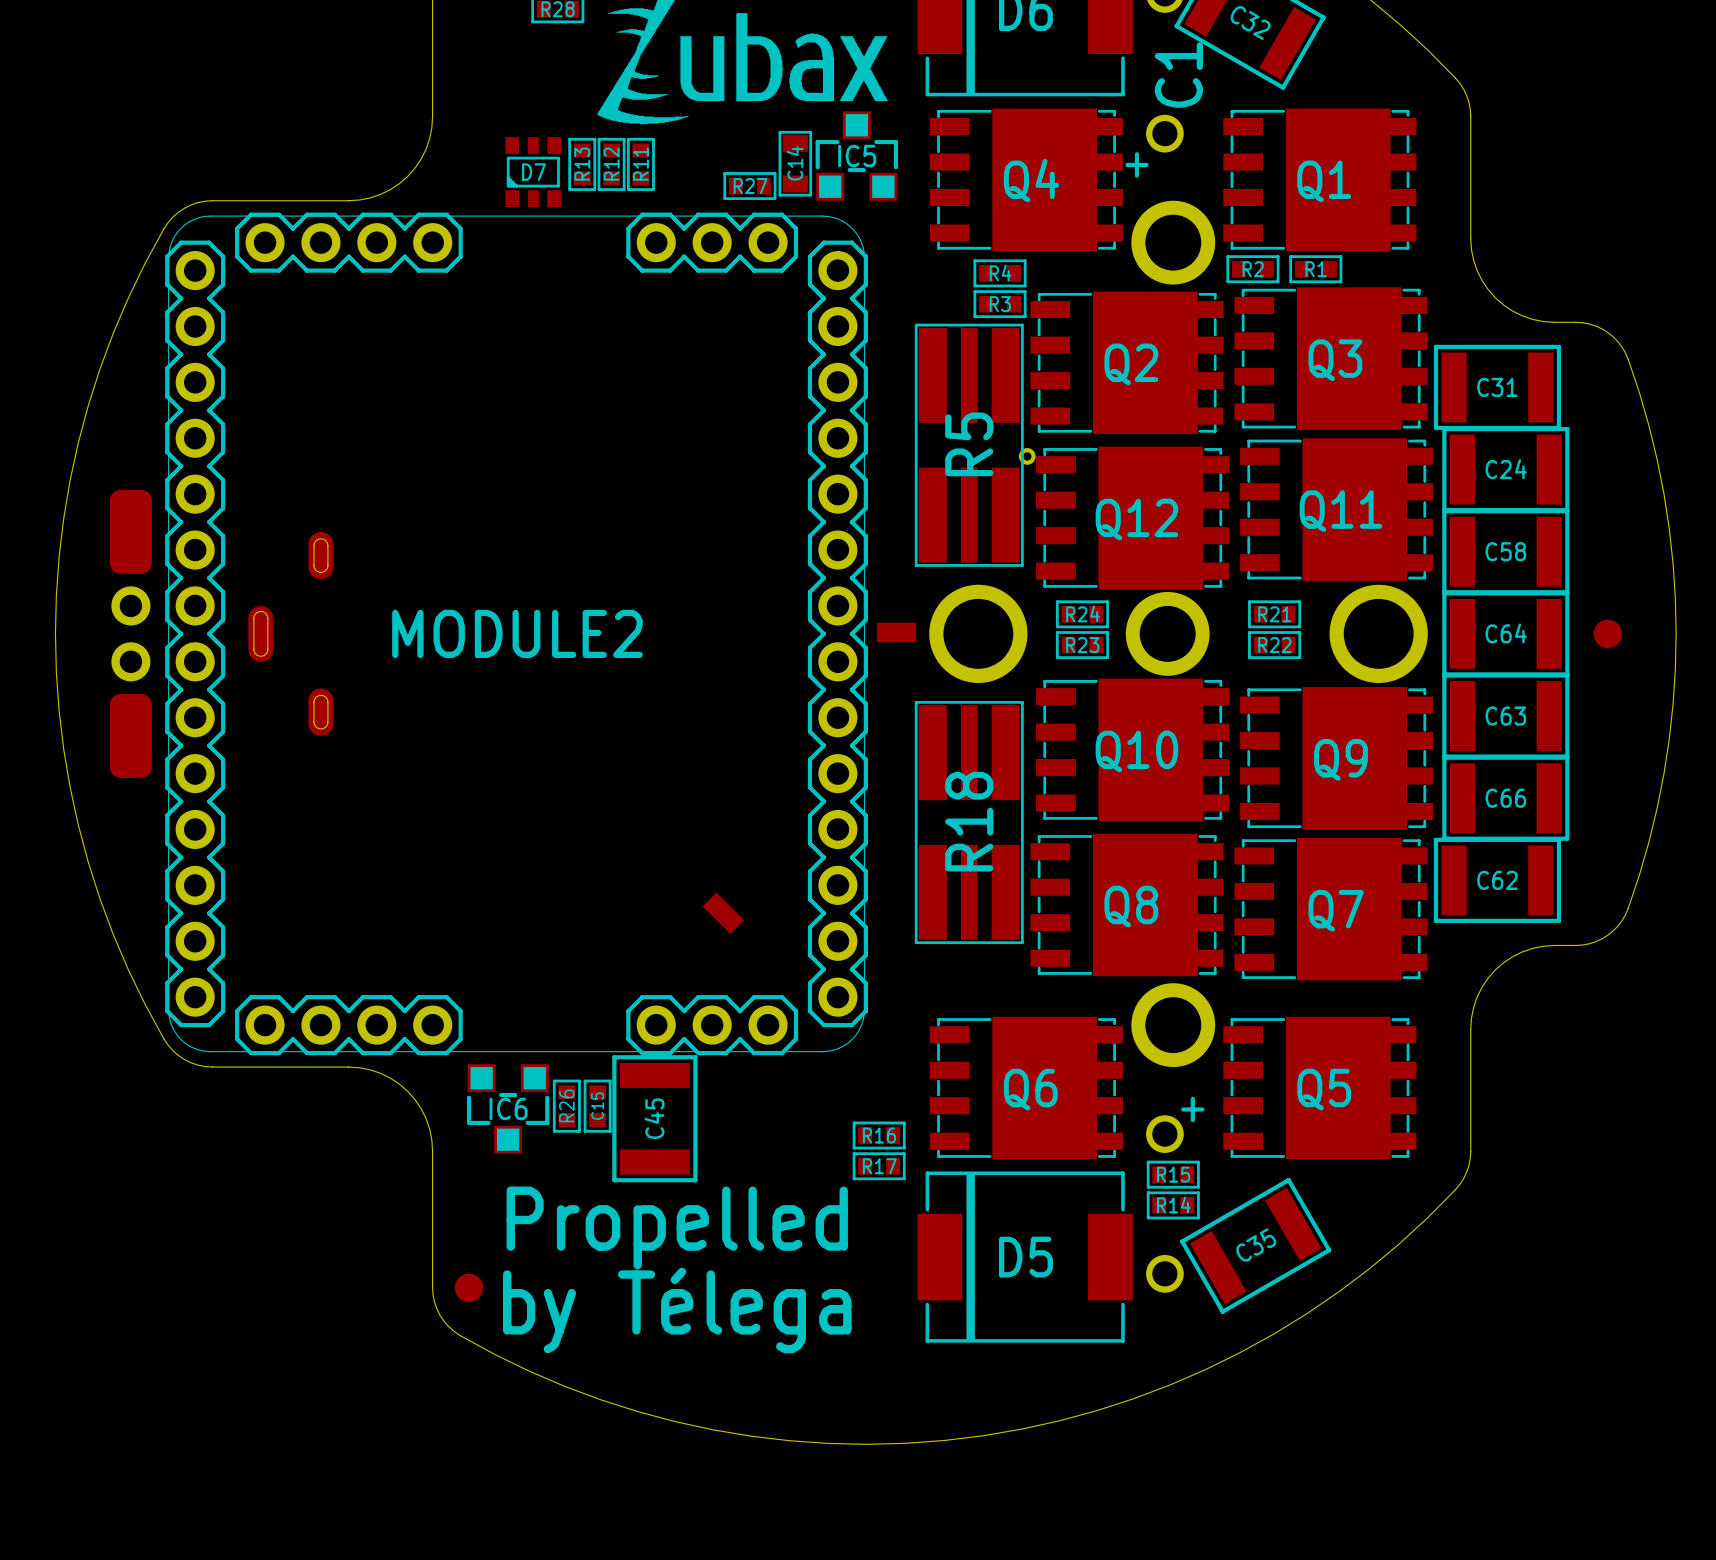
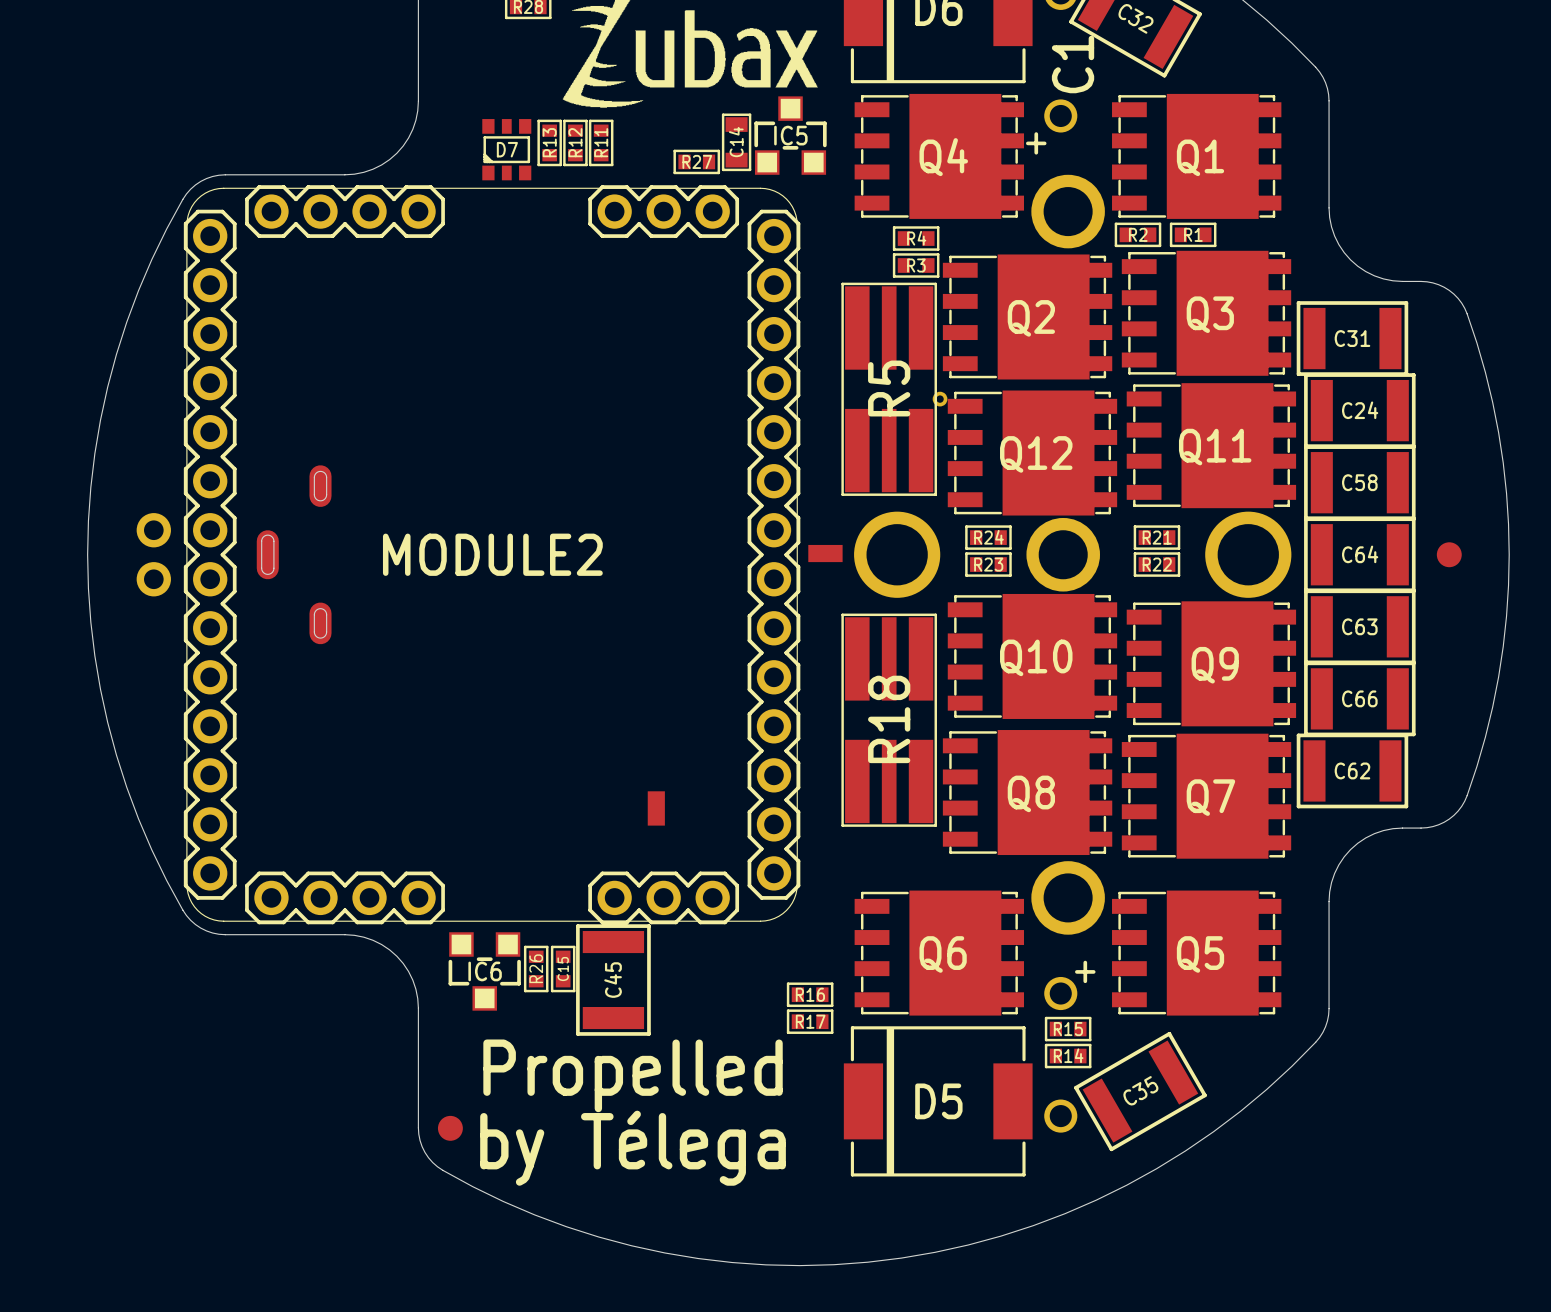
part: (130, 531) -> none
part: (130, 735) -> none
part rotation: 0° (723, 913) -> 45° clockwise (656, 808)

